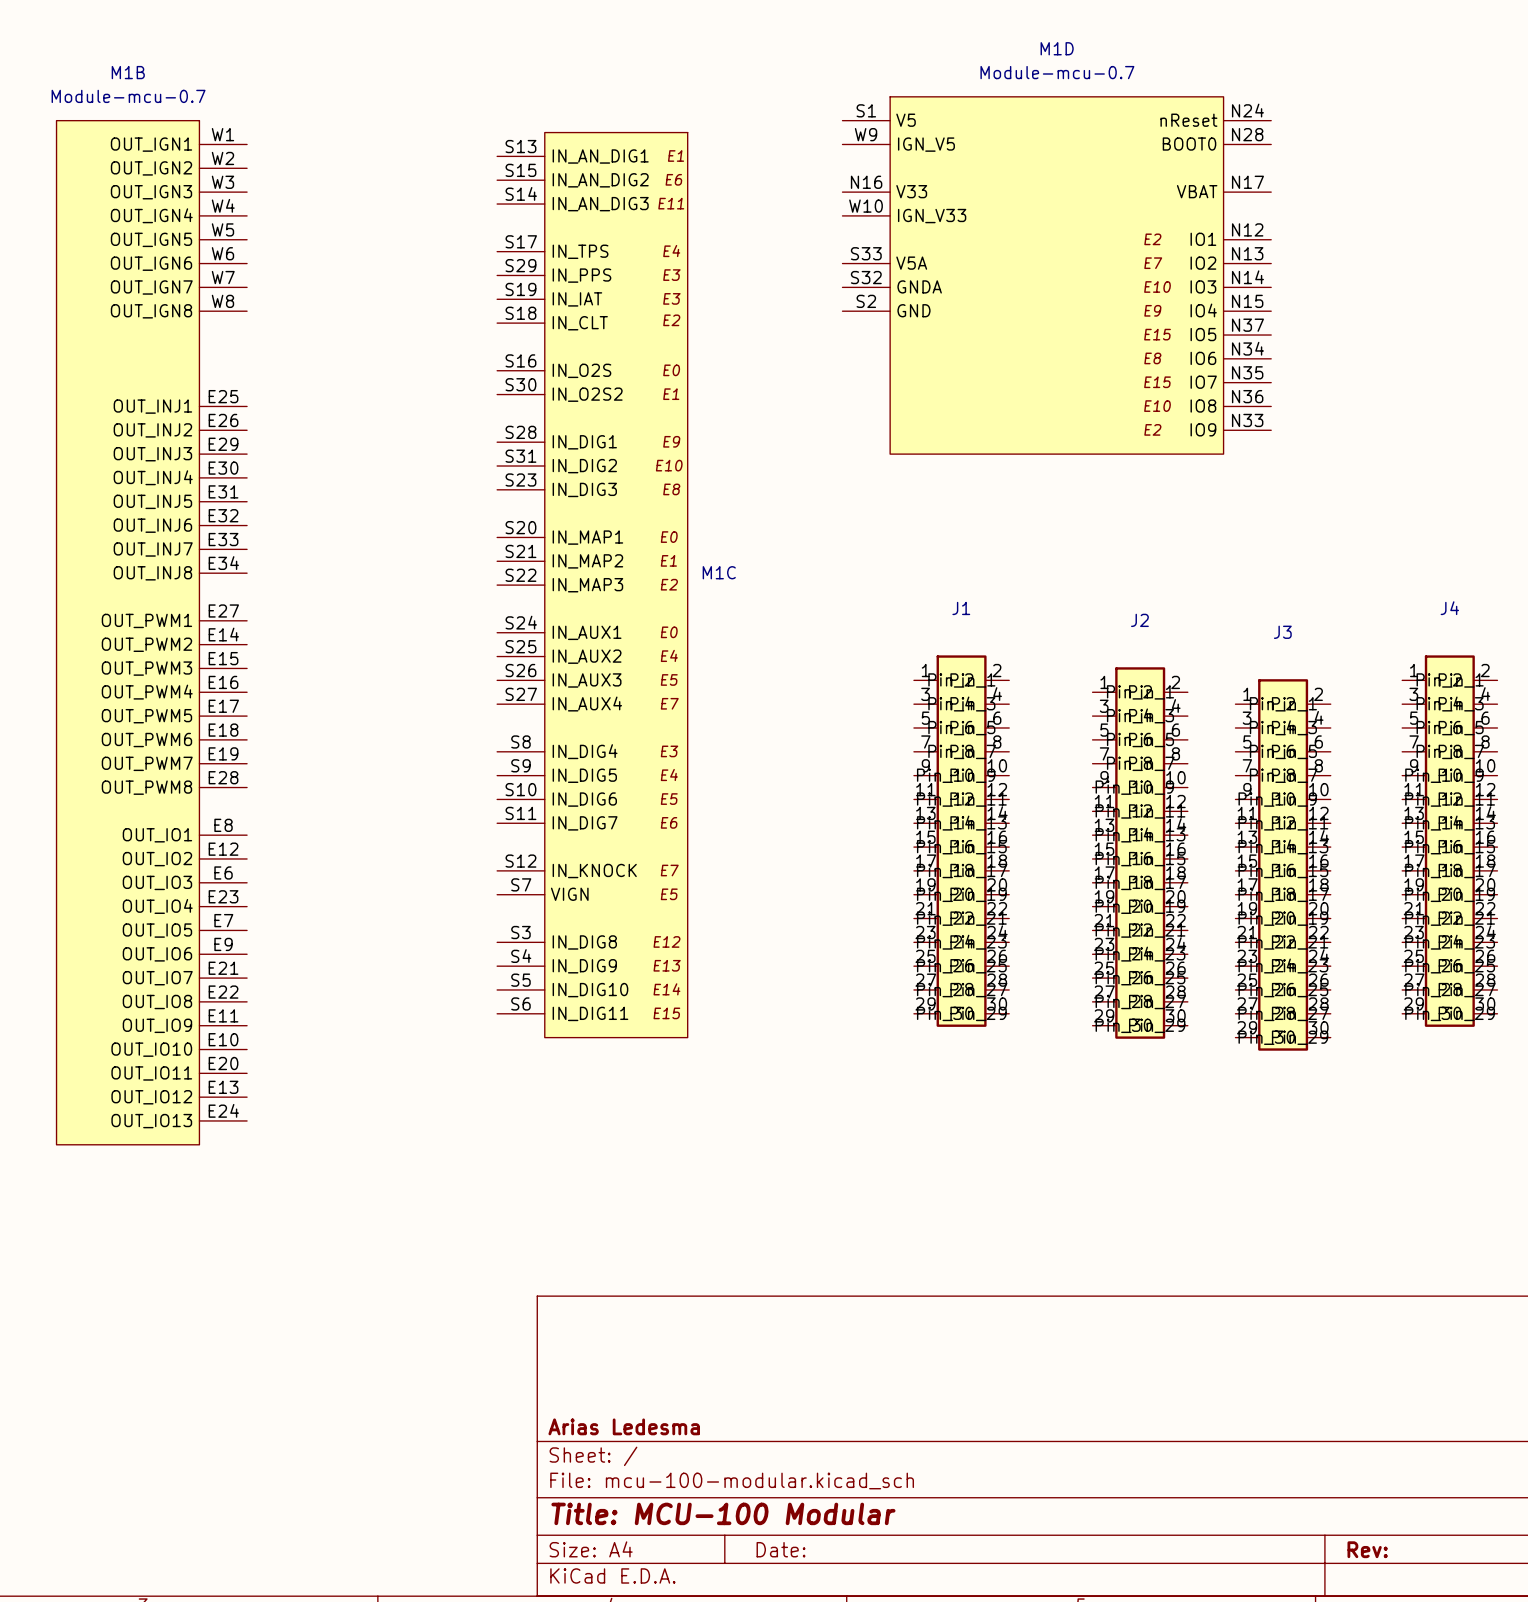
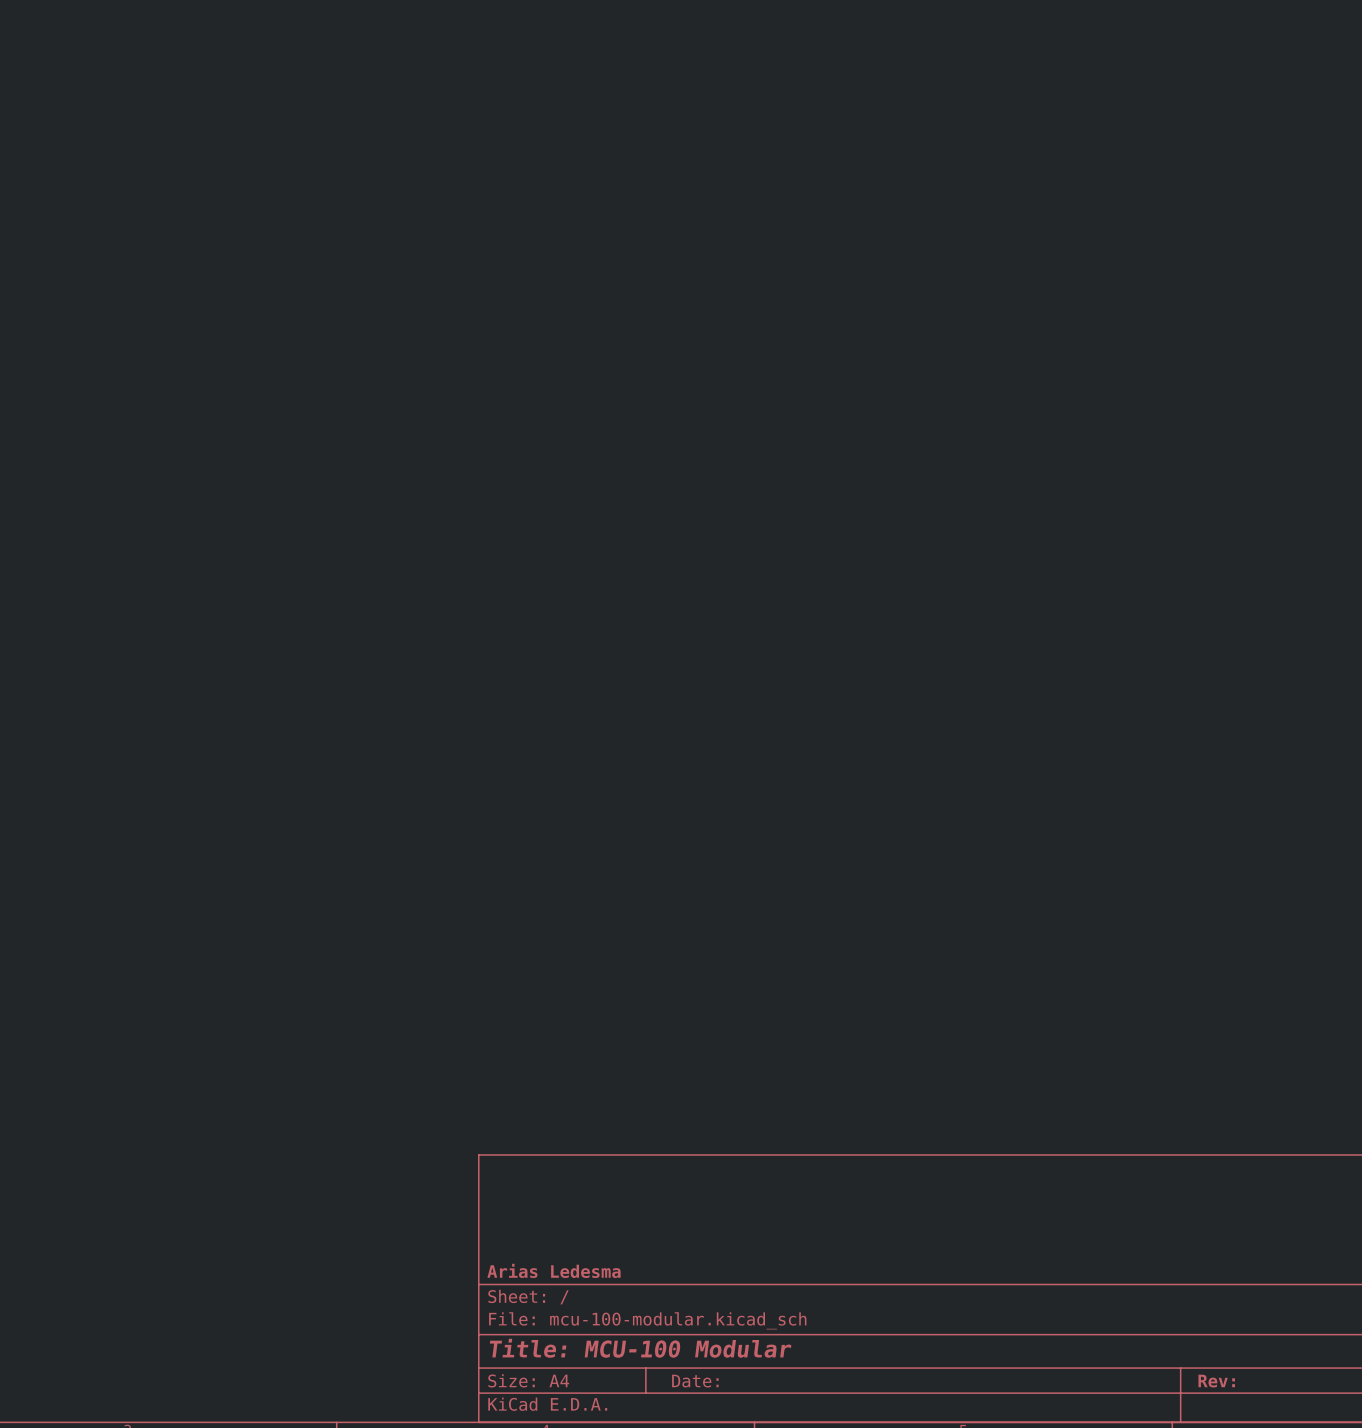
M1D: Module-mcu-0.7 (1056, 275) -> none
M1C: (592, 585) -> none
M1B: Module-mcu-0.7 (151, 632) -> none
J1: (961, 841) -> none
J4: (1449, 841) -> none
J2: (1140, 853) -> none
J3: (1283, 864) -> none

